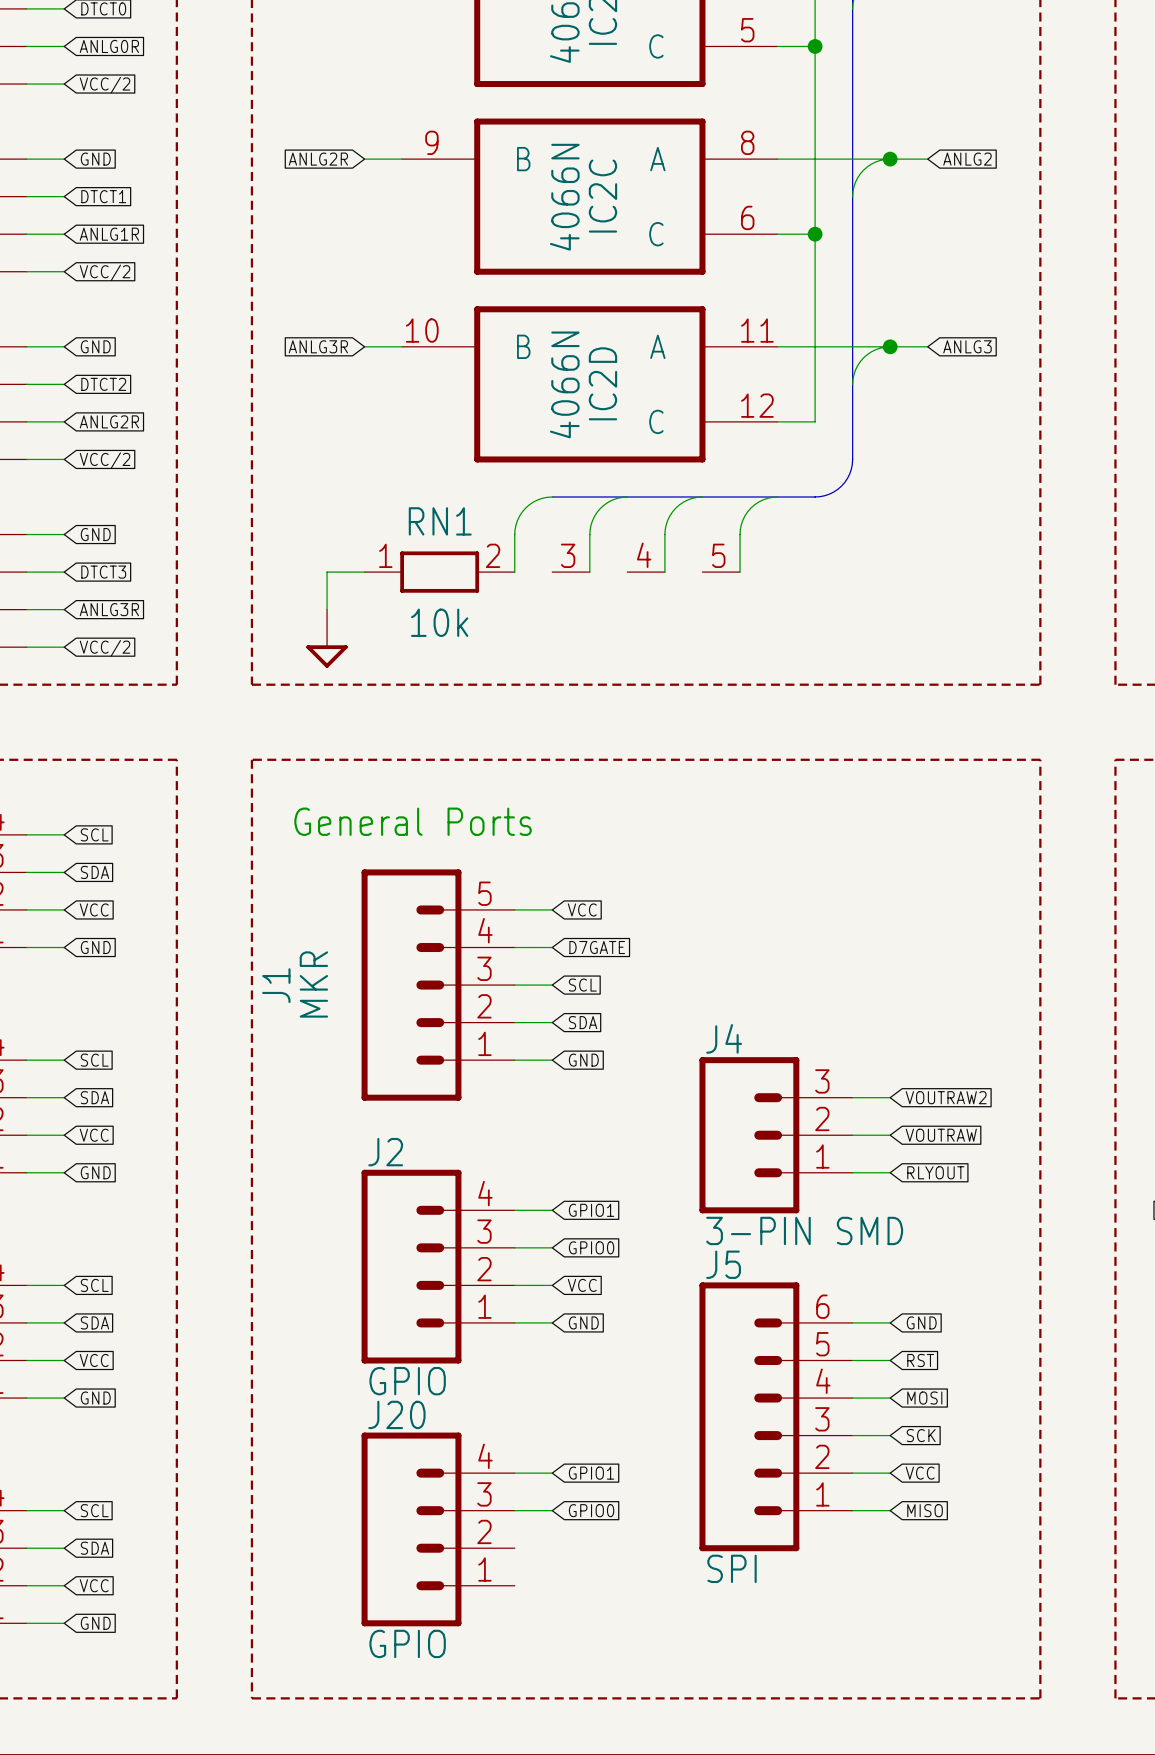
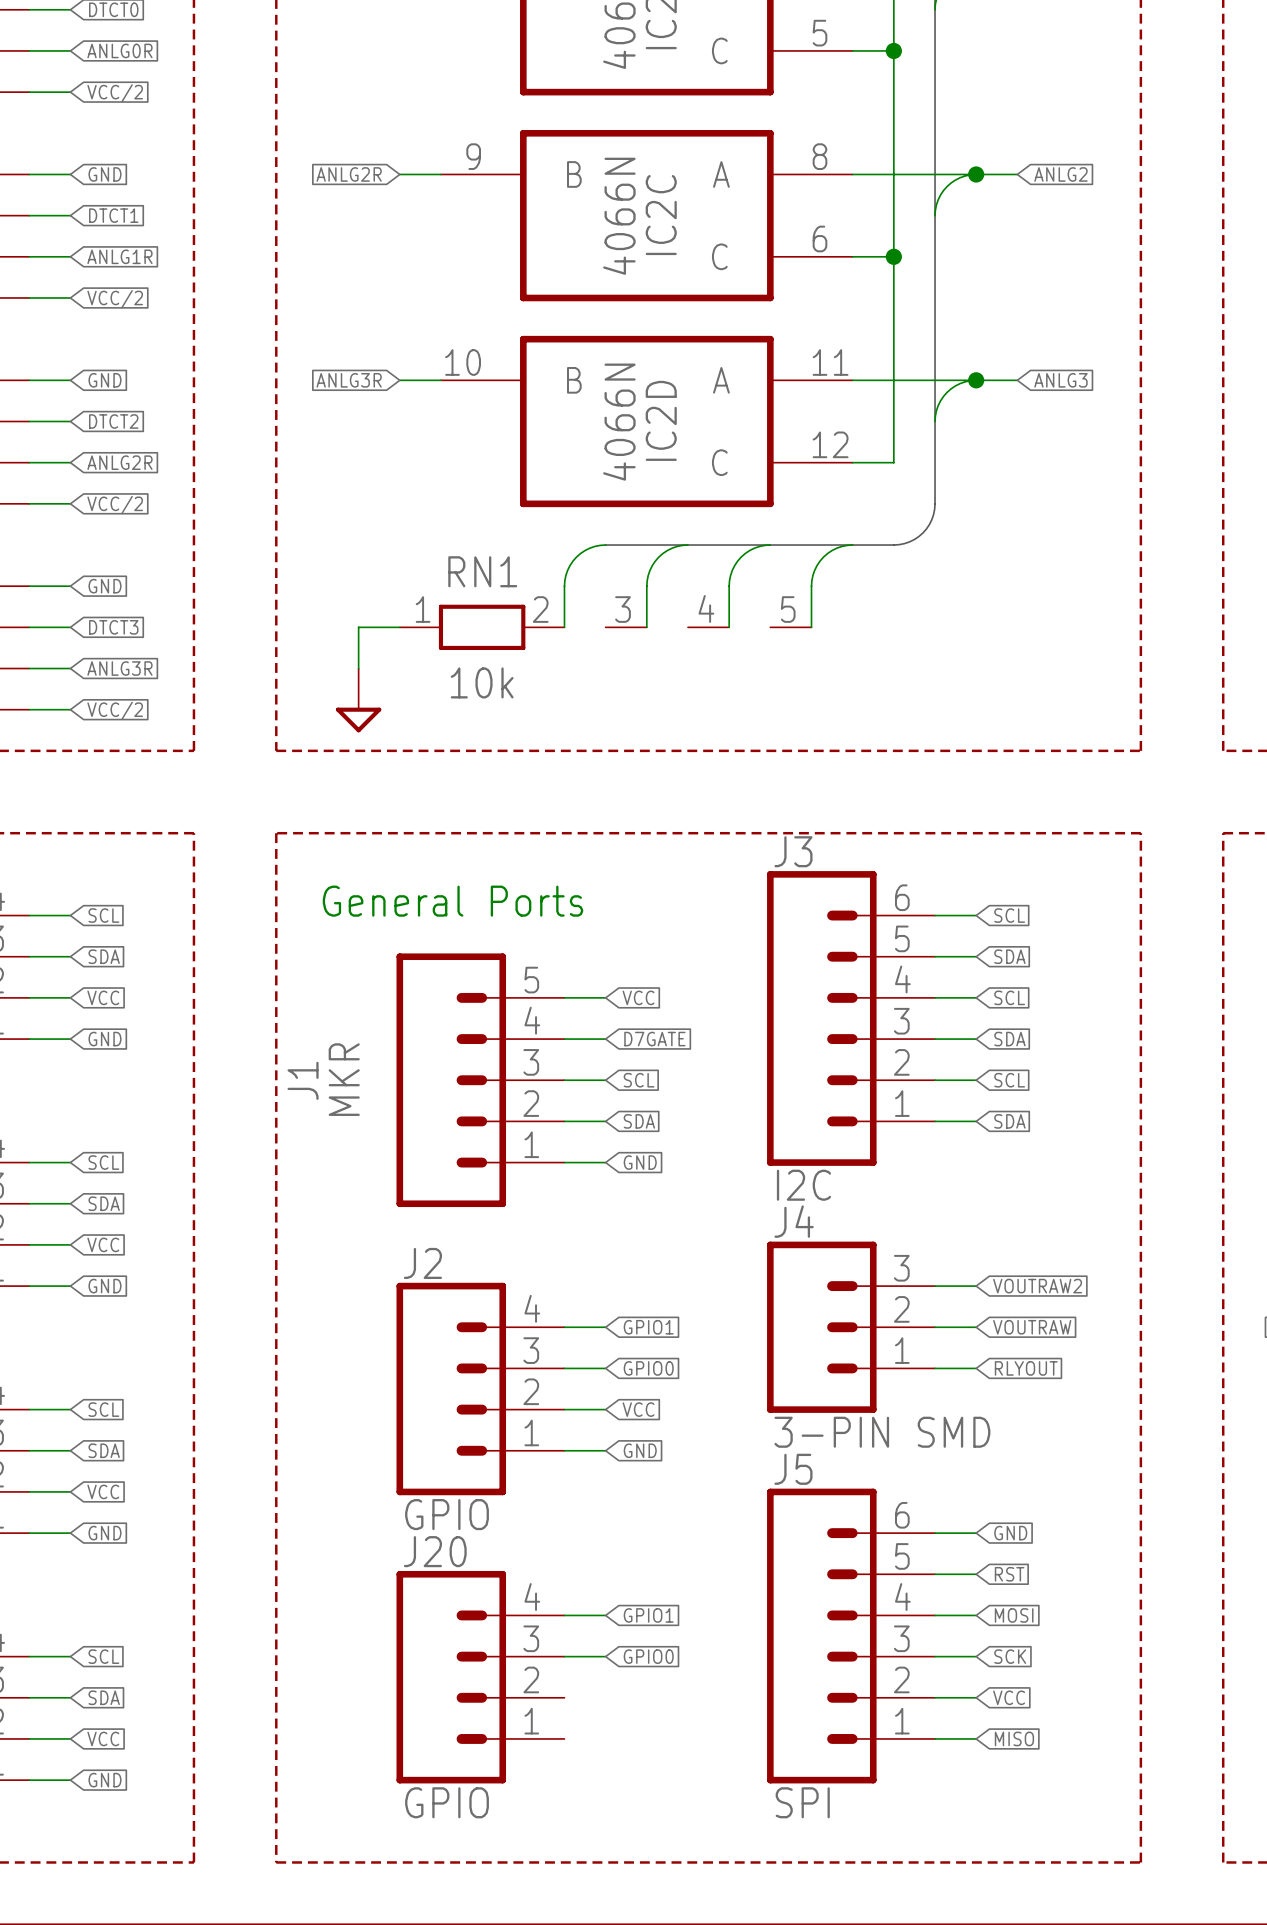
wire: none -> (935, 915) (976, 915)
global label: none -> SCL (1009, 915)
wire: none -> (935, 956) (976, 956)
global label: none -> SDA (1009, 956)
wire: none -> (935, 997) (976, 997)
global label: none -> SCL (1009, 997)
J3: none -> I2C (851, 1018)
wire: none -> (935, 1039) (976, 1039)
global label: none -> SDA (1009, 1039)
global label: none -> SCL (1009, 1080)
global label: none -> SDA (1009, 1121)
wire: (852, 1097) (890, 1097) -> (935, 1080) (976, 1080)
global label: VOUTRAW2 (946, 1097) -> none
J4 position: (776, 1135) -> (851, 1327)
wire: (852, 1135) (890, 1135) -> (935, 1121) (976, 1121)
global label position: VOUTRAW (941, 1135) -> VOUTRAW (1032, 1327)
global label: RLYOUT (935, 1172) -> VOUTRAW2 (1037, 1286)
global label: none -> RLYOUT (1026, 1368)
wire: (852, 1322) (890, 1322) -> (935, 1327) (976, 1327)
global label: GND (921, 1322) -> none
wire: (852, 1360) (890, 1360) -> (935, 1368) (976, 1368)
global label: RST (920, 1360) -> none
global label: MOSI (924, 1398) -> GND (1010, 1533)
J5 position: (776, 1416) -> (851, 1636)
global label: SCK (921, 1435) -> RST (1009, 1574)
global label: VCC (920, 1473) -> MOSI (1014, 1615)
global label: MISO (925, 1510) -> SCK (1010, 1656)
wire: none -> (935, 1697) (976, 1697)
global label: none -> VCC (1009, 1697)
wire: none -> (935, 1738) (976, 1738)
global label: none -> MISO (1014, 1738)

